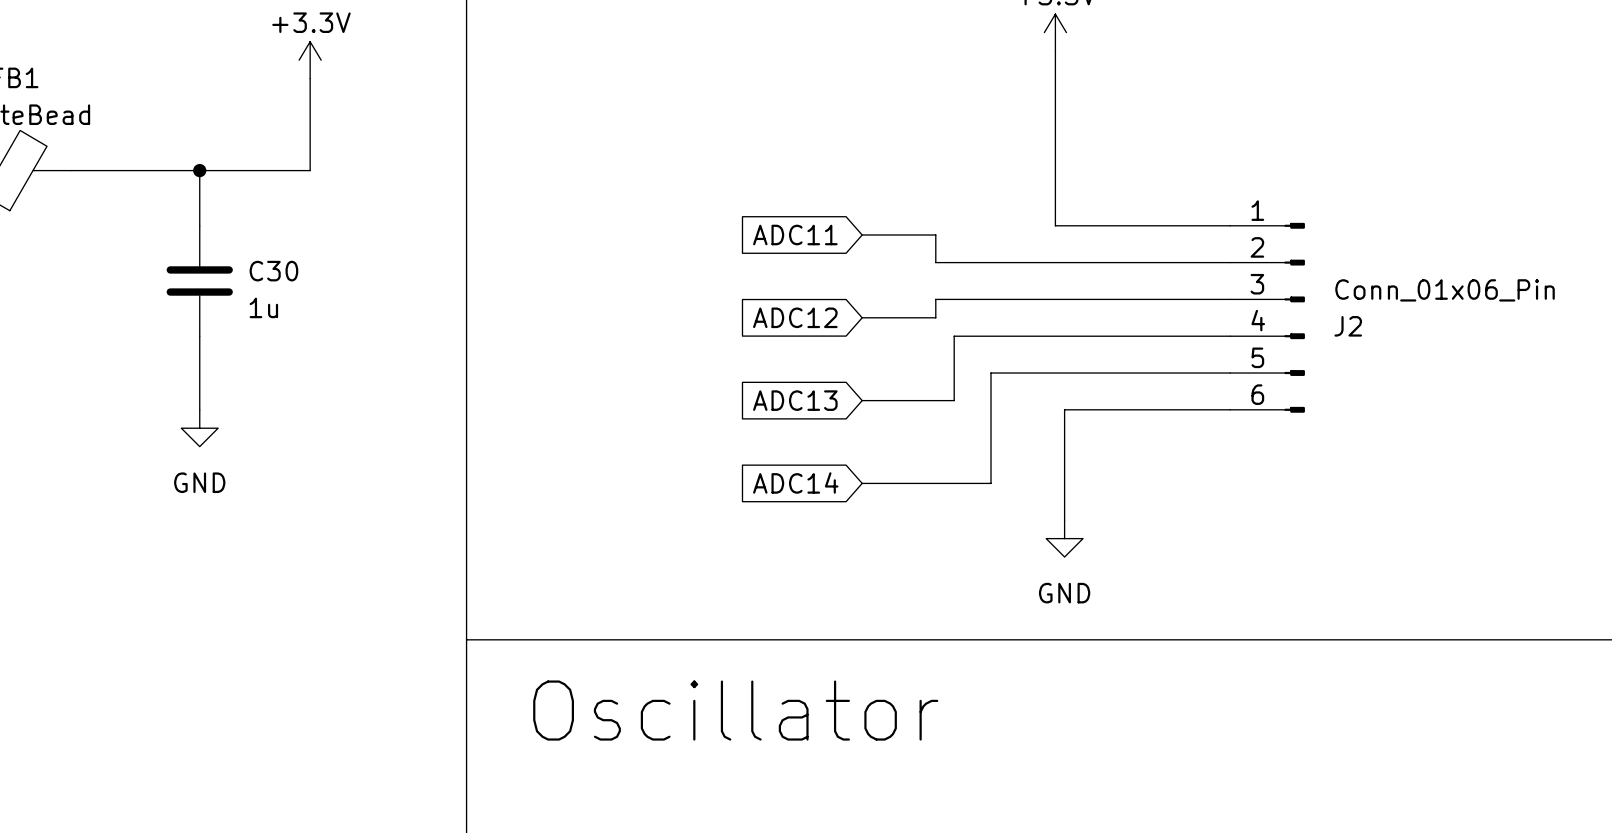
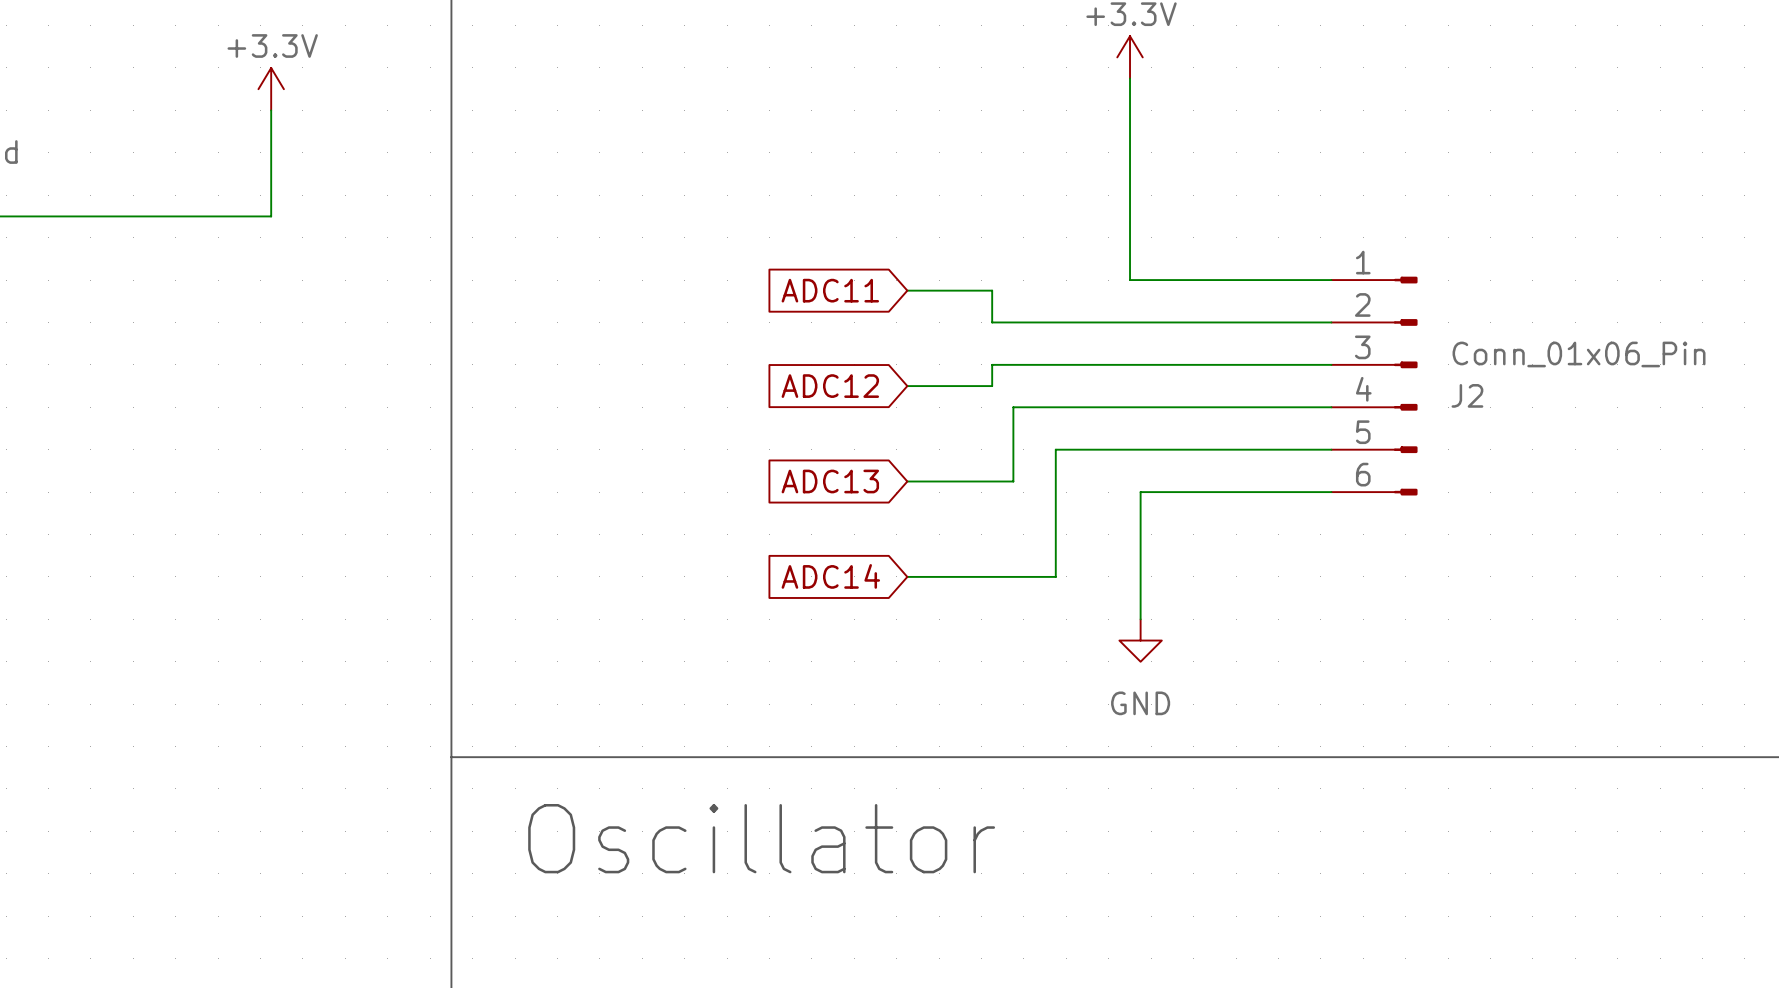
wire: (199, 170) (199, 225) -> none
junction: (199, 170) -> none
C30: 1u (199, 281) -> none
wire: (199, 336) (199, 409) -> none
power symbol: GND (199, 428) -> none

